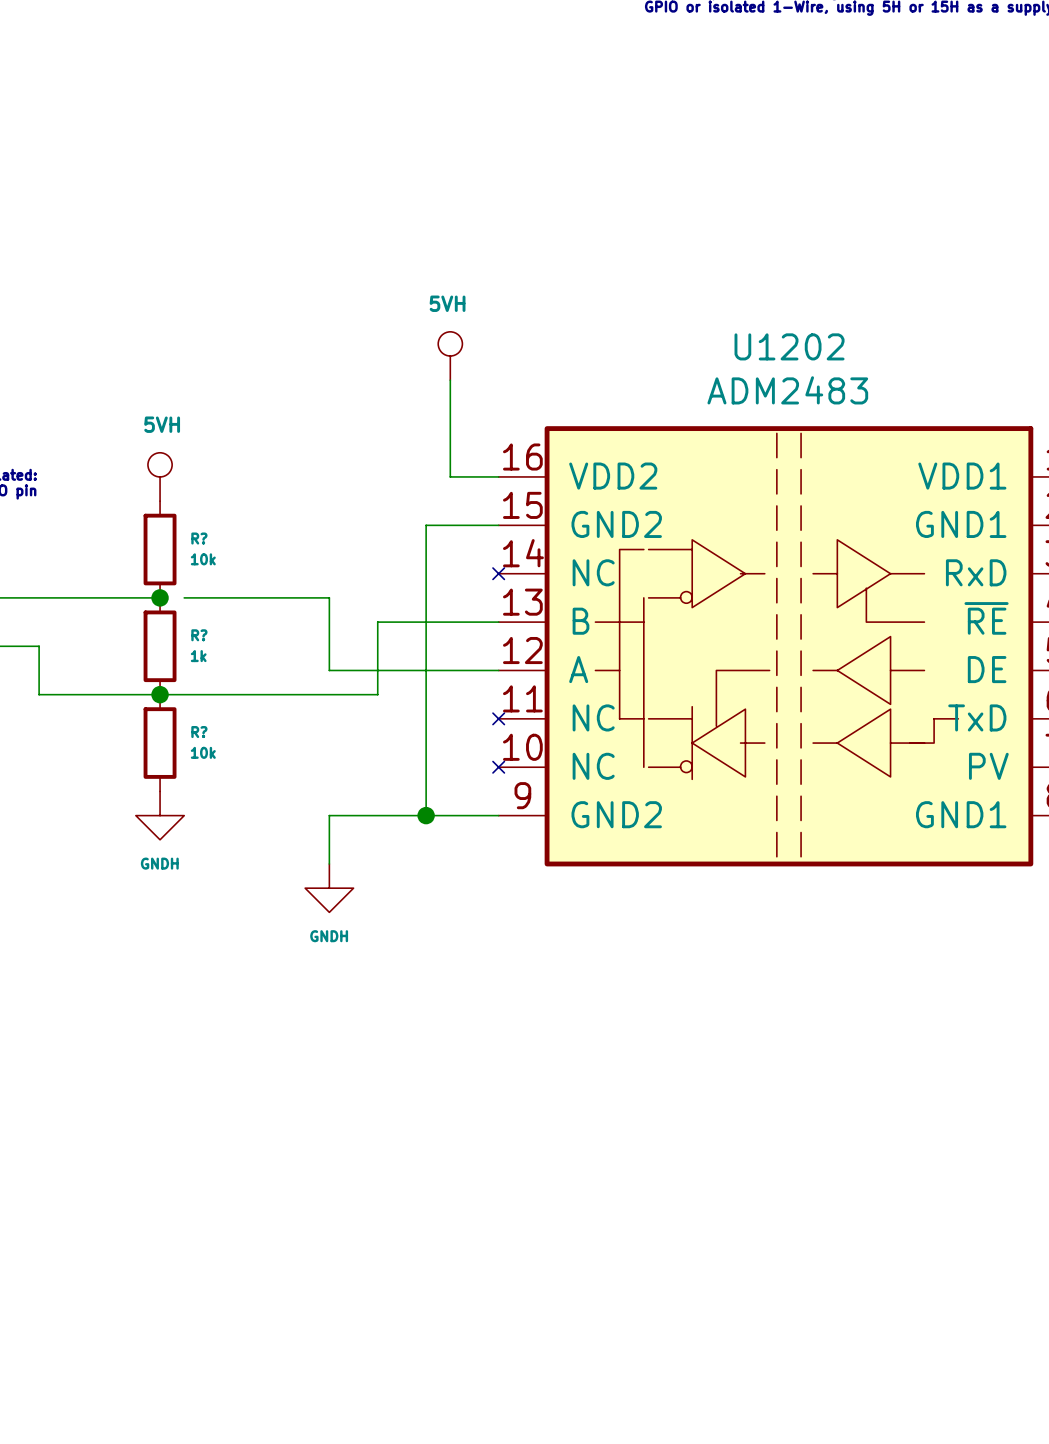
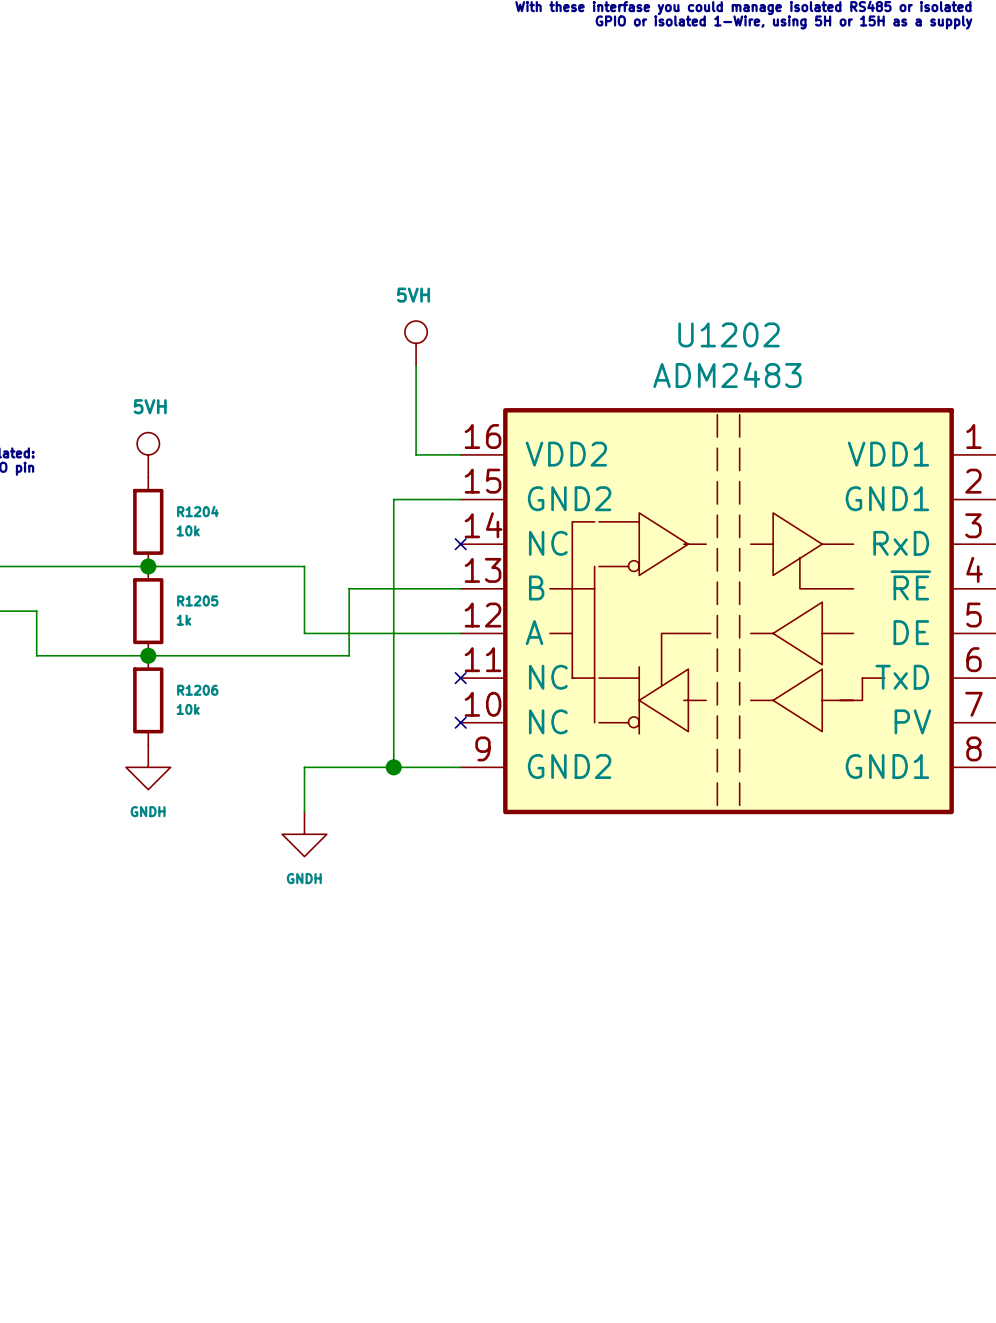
R? name: R? (199, 538) -> R1204 (197, 511)
wire: none -> (148, 566) (170, 566)
R? name: R? (199, 635) -> R1205 (197, 600)
R? name: R? (199, 732) -> R1206 (197, 690)

